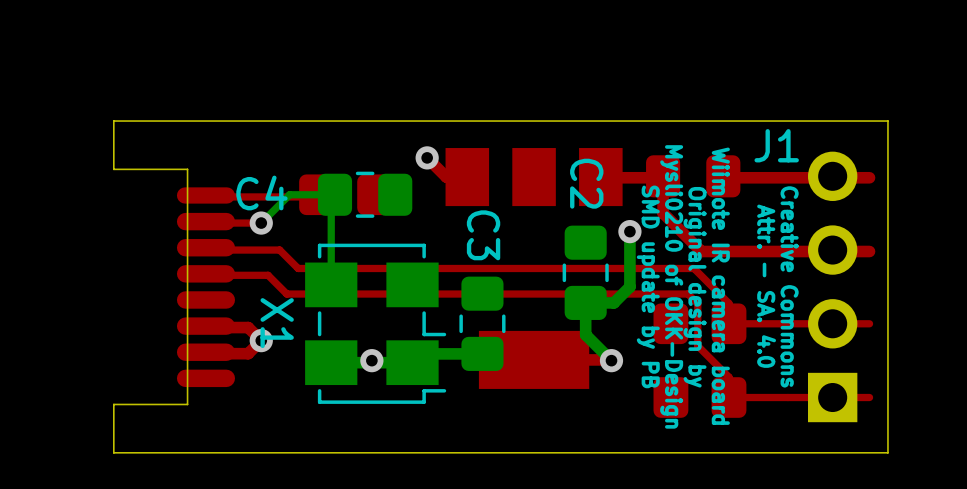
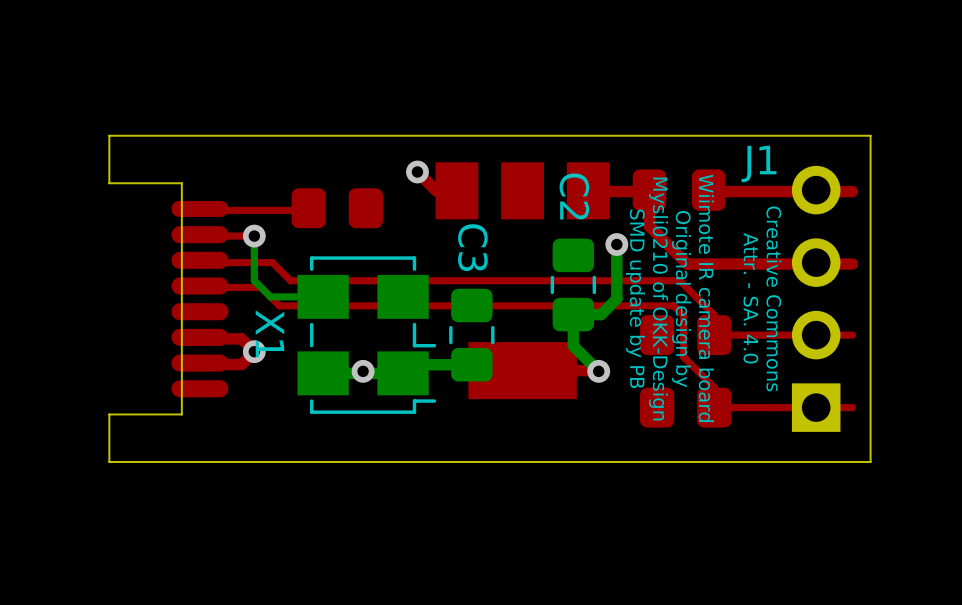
C4: (365, 194) -> none
bottom track: (261, 223) (289, 194) (335, 194) (331, 198) (331, 284) -> (254, 236) (254, 280) (270, 296) (323, 296)

